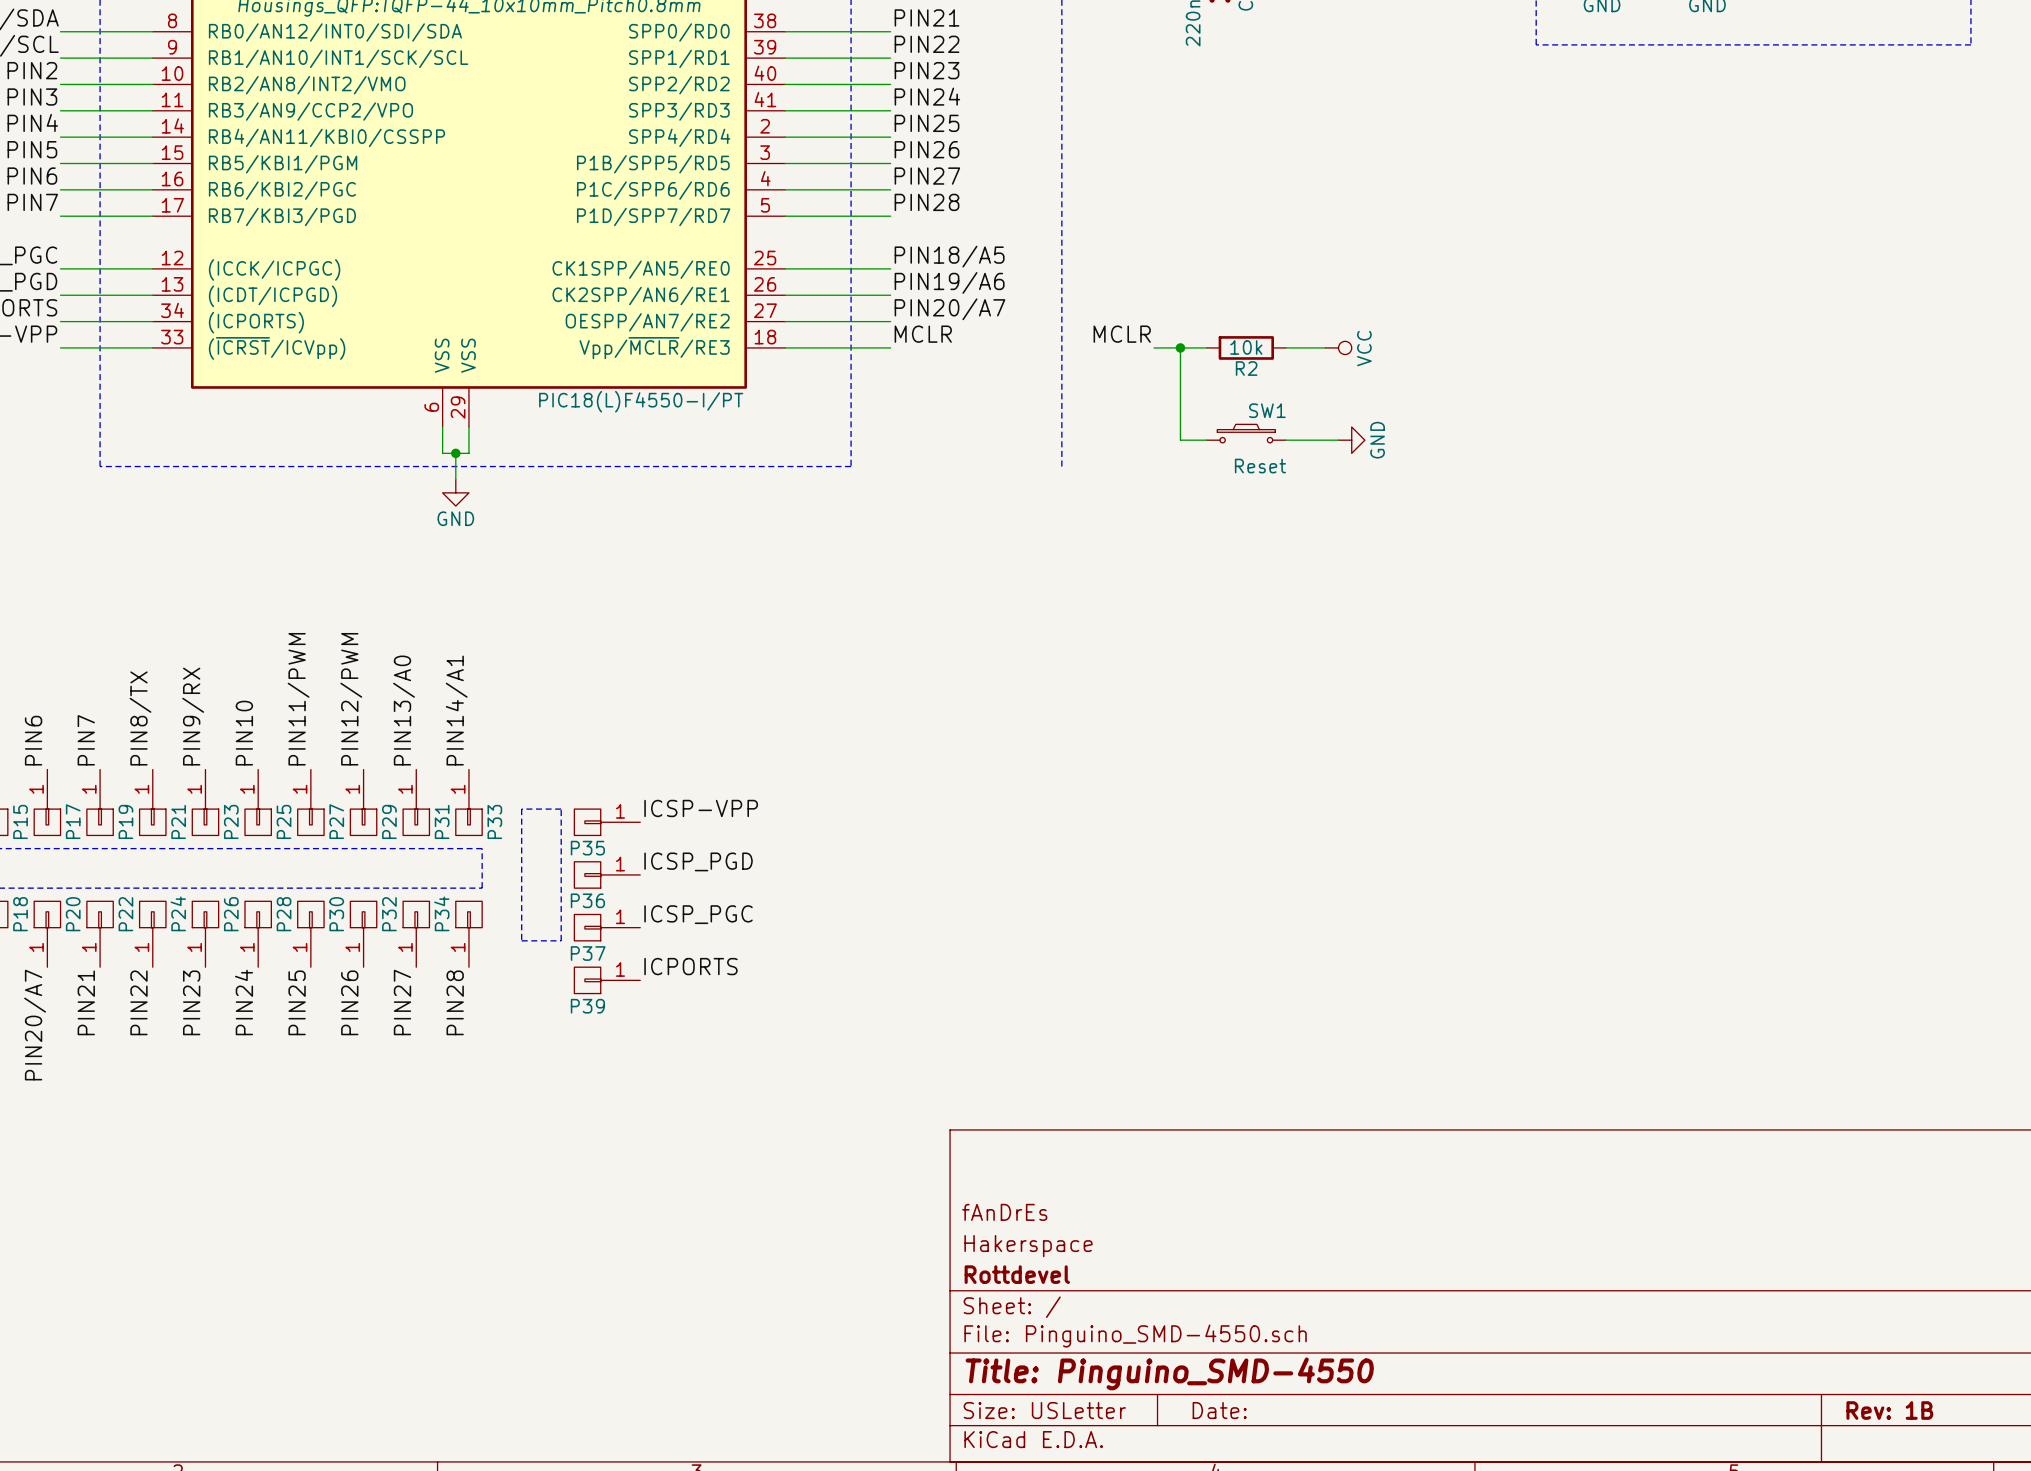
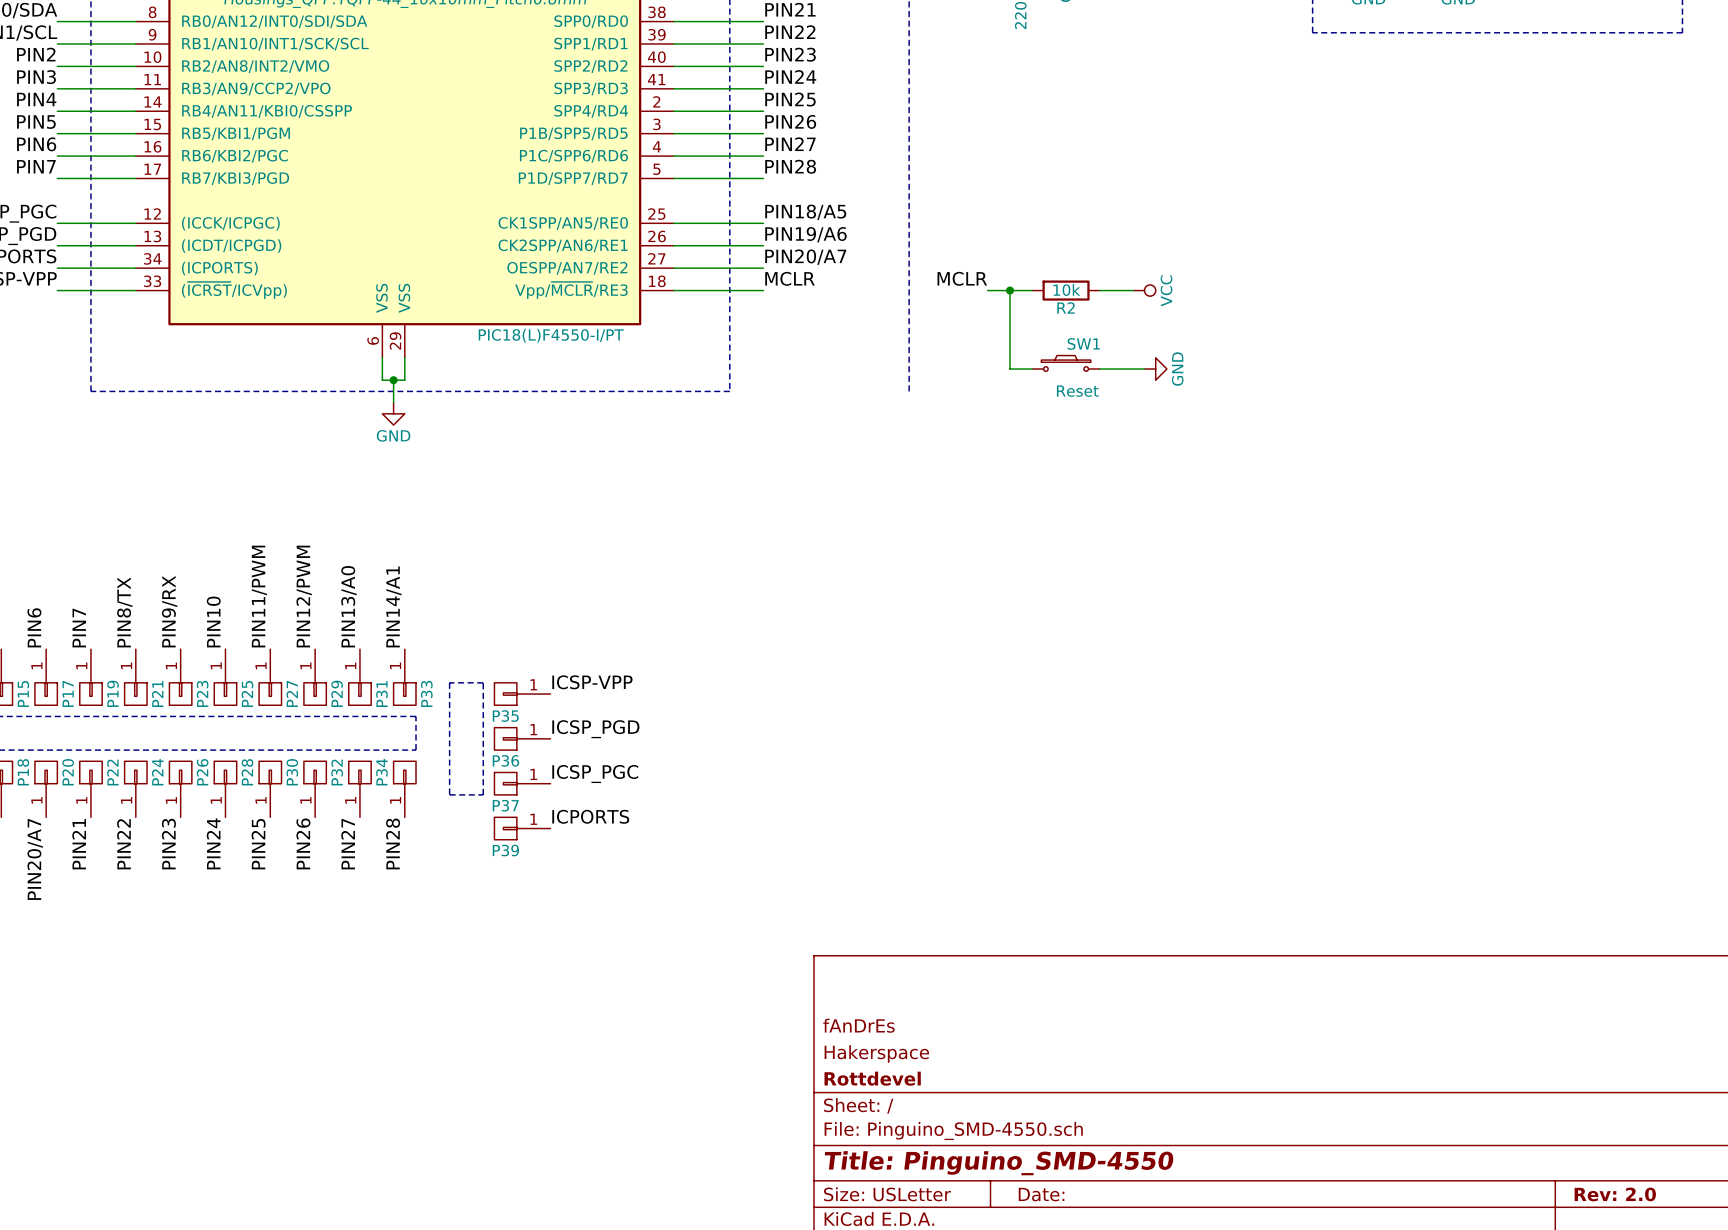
title block: Rev: 1B (1889, 1410) -> Rev: 2.0 (1615, 1194)

